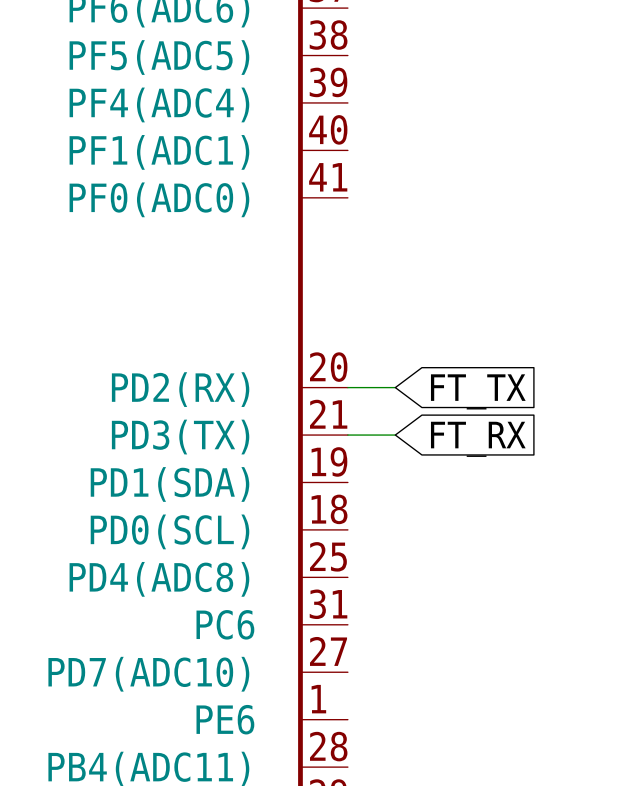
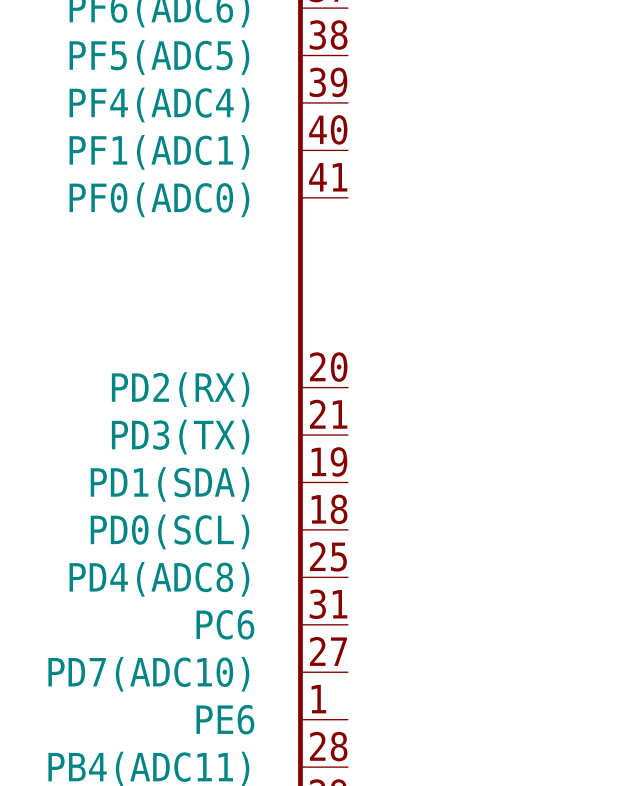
wire: (347, 387) (395, 387) -> none
global label: FT_TX (478, 391) -> none
wire: (347, 435) (395, 435) -> none
global label: FT_RX (478, 439) -> none

